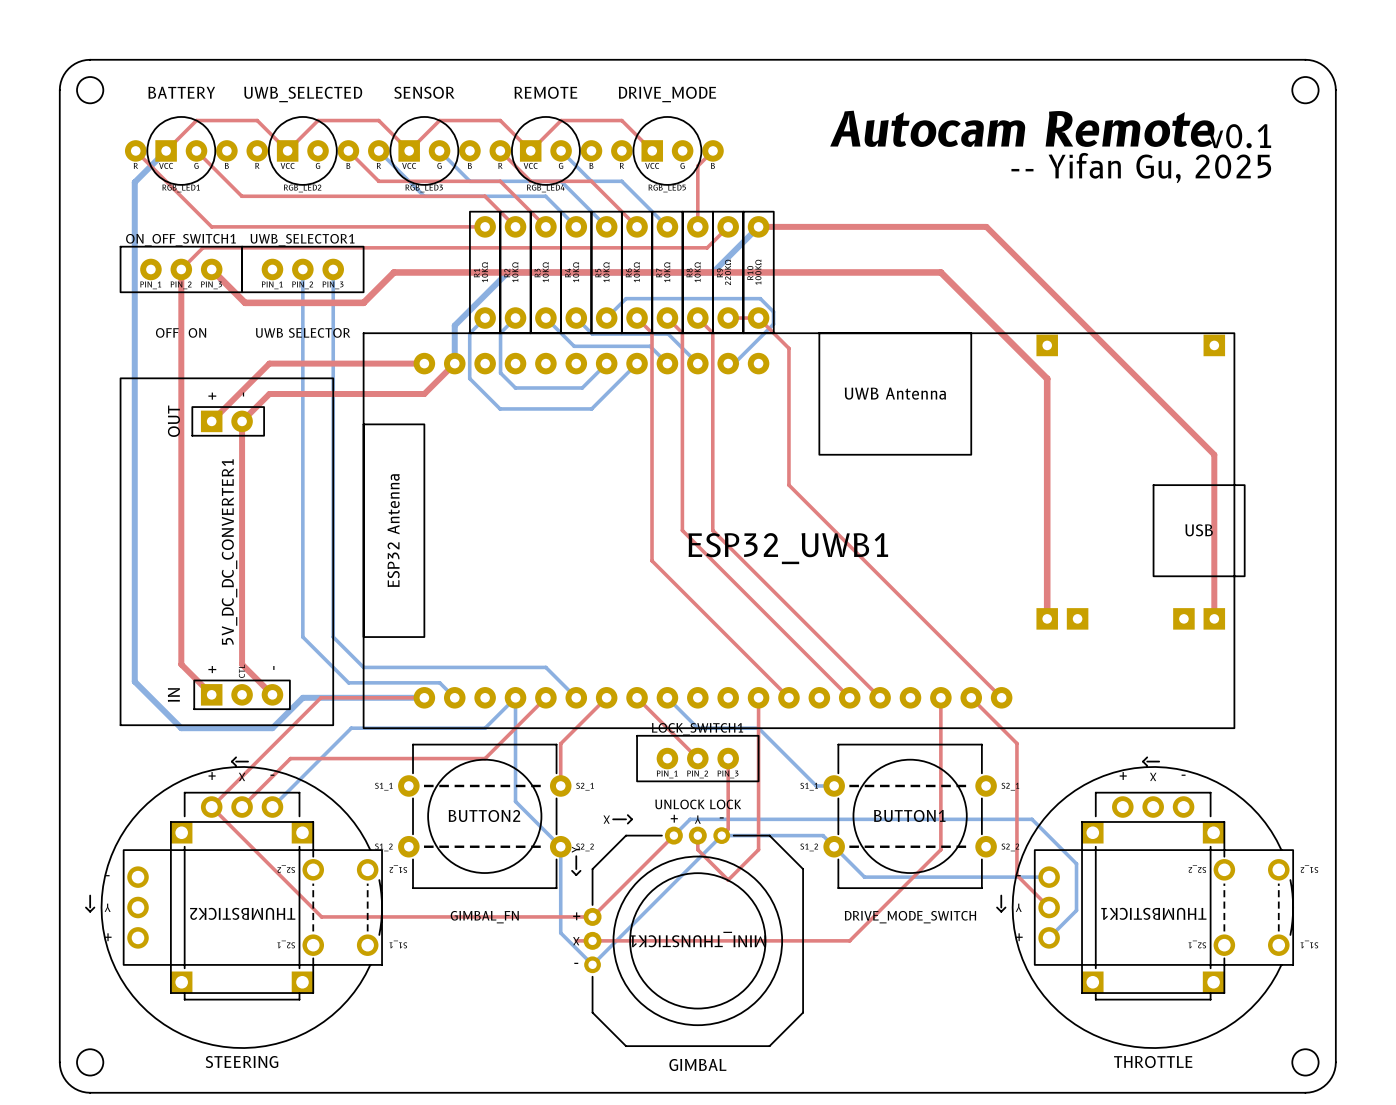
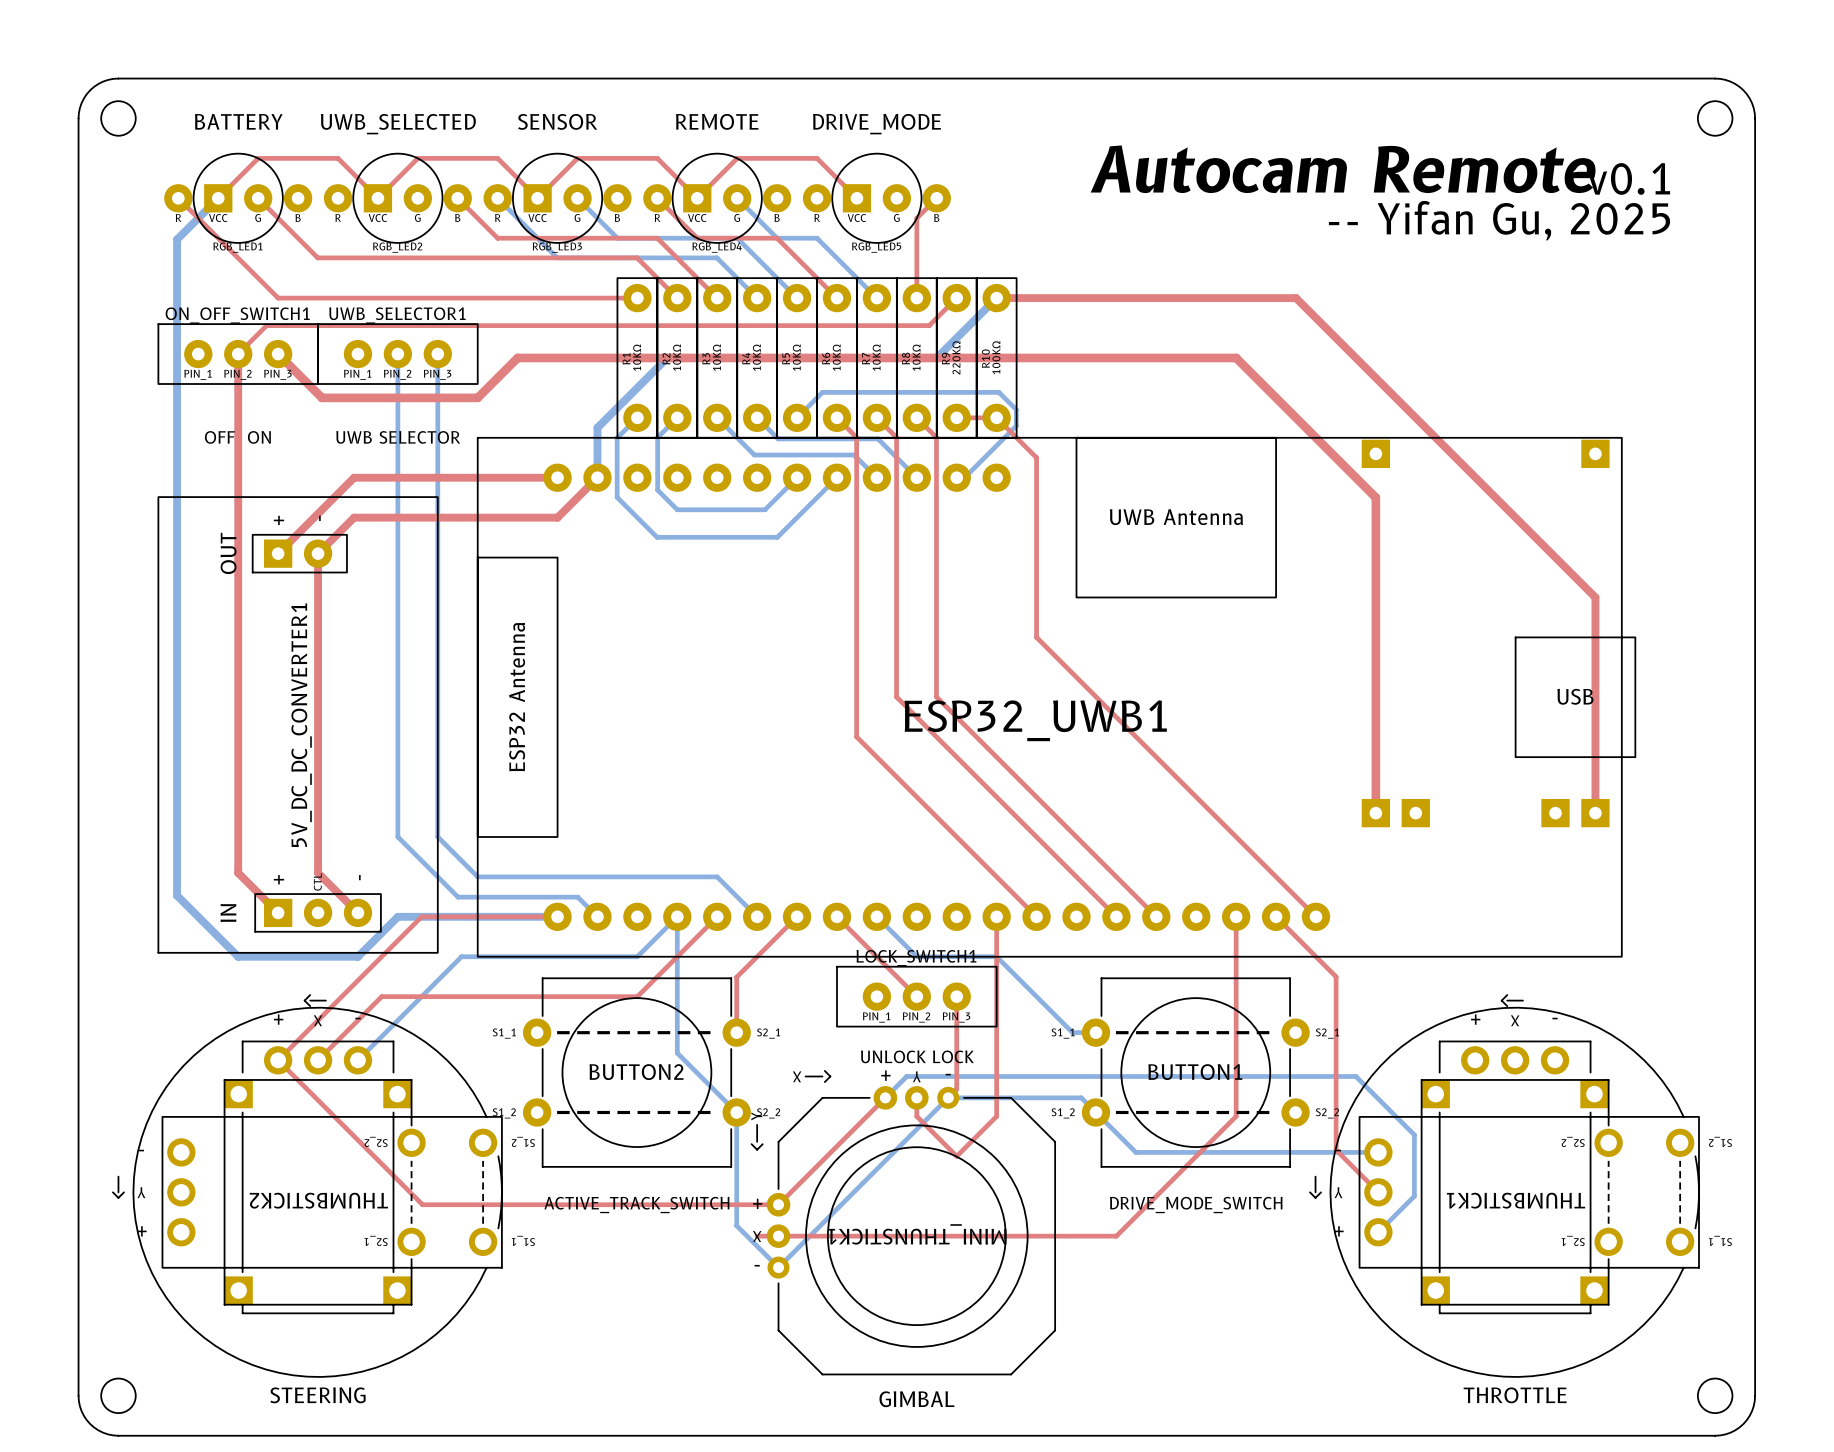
BUTTON2 value: GIMBAL_FN (484, 917) -> ACTIVE_TRACK_SWITCH (636, 1205)

